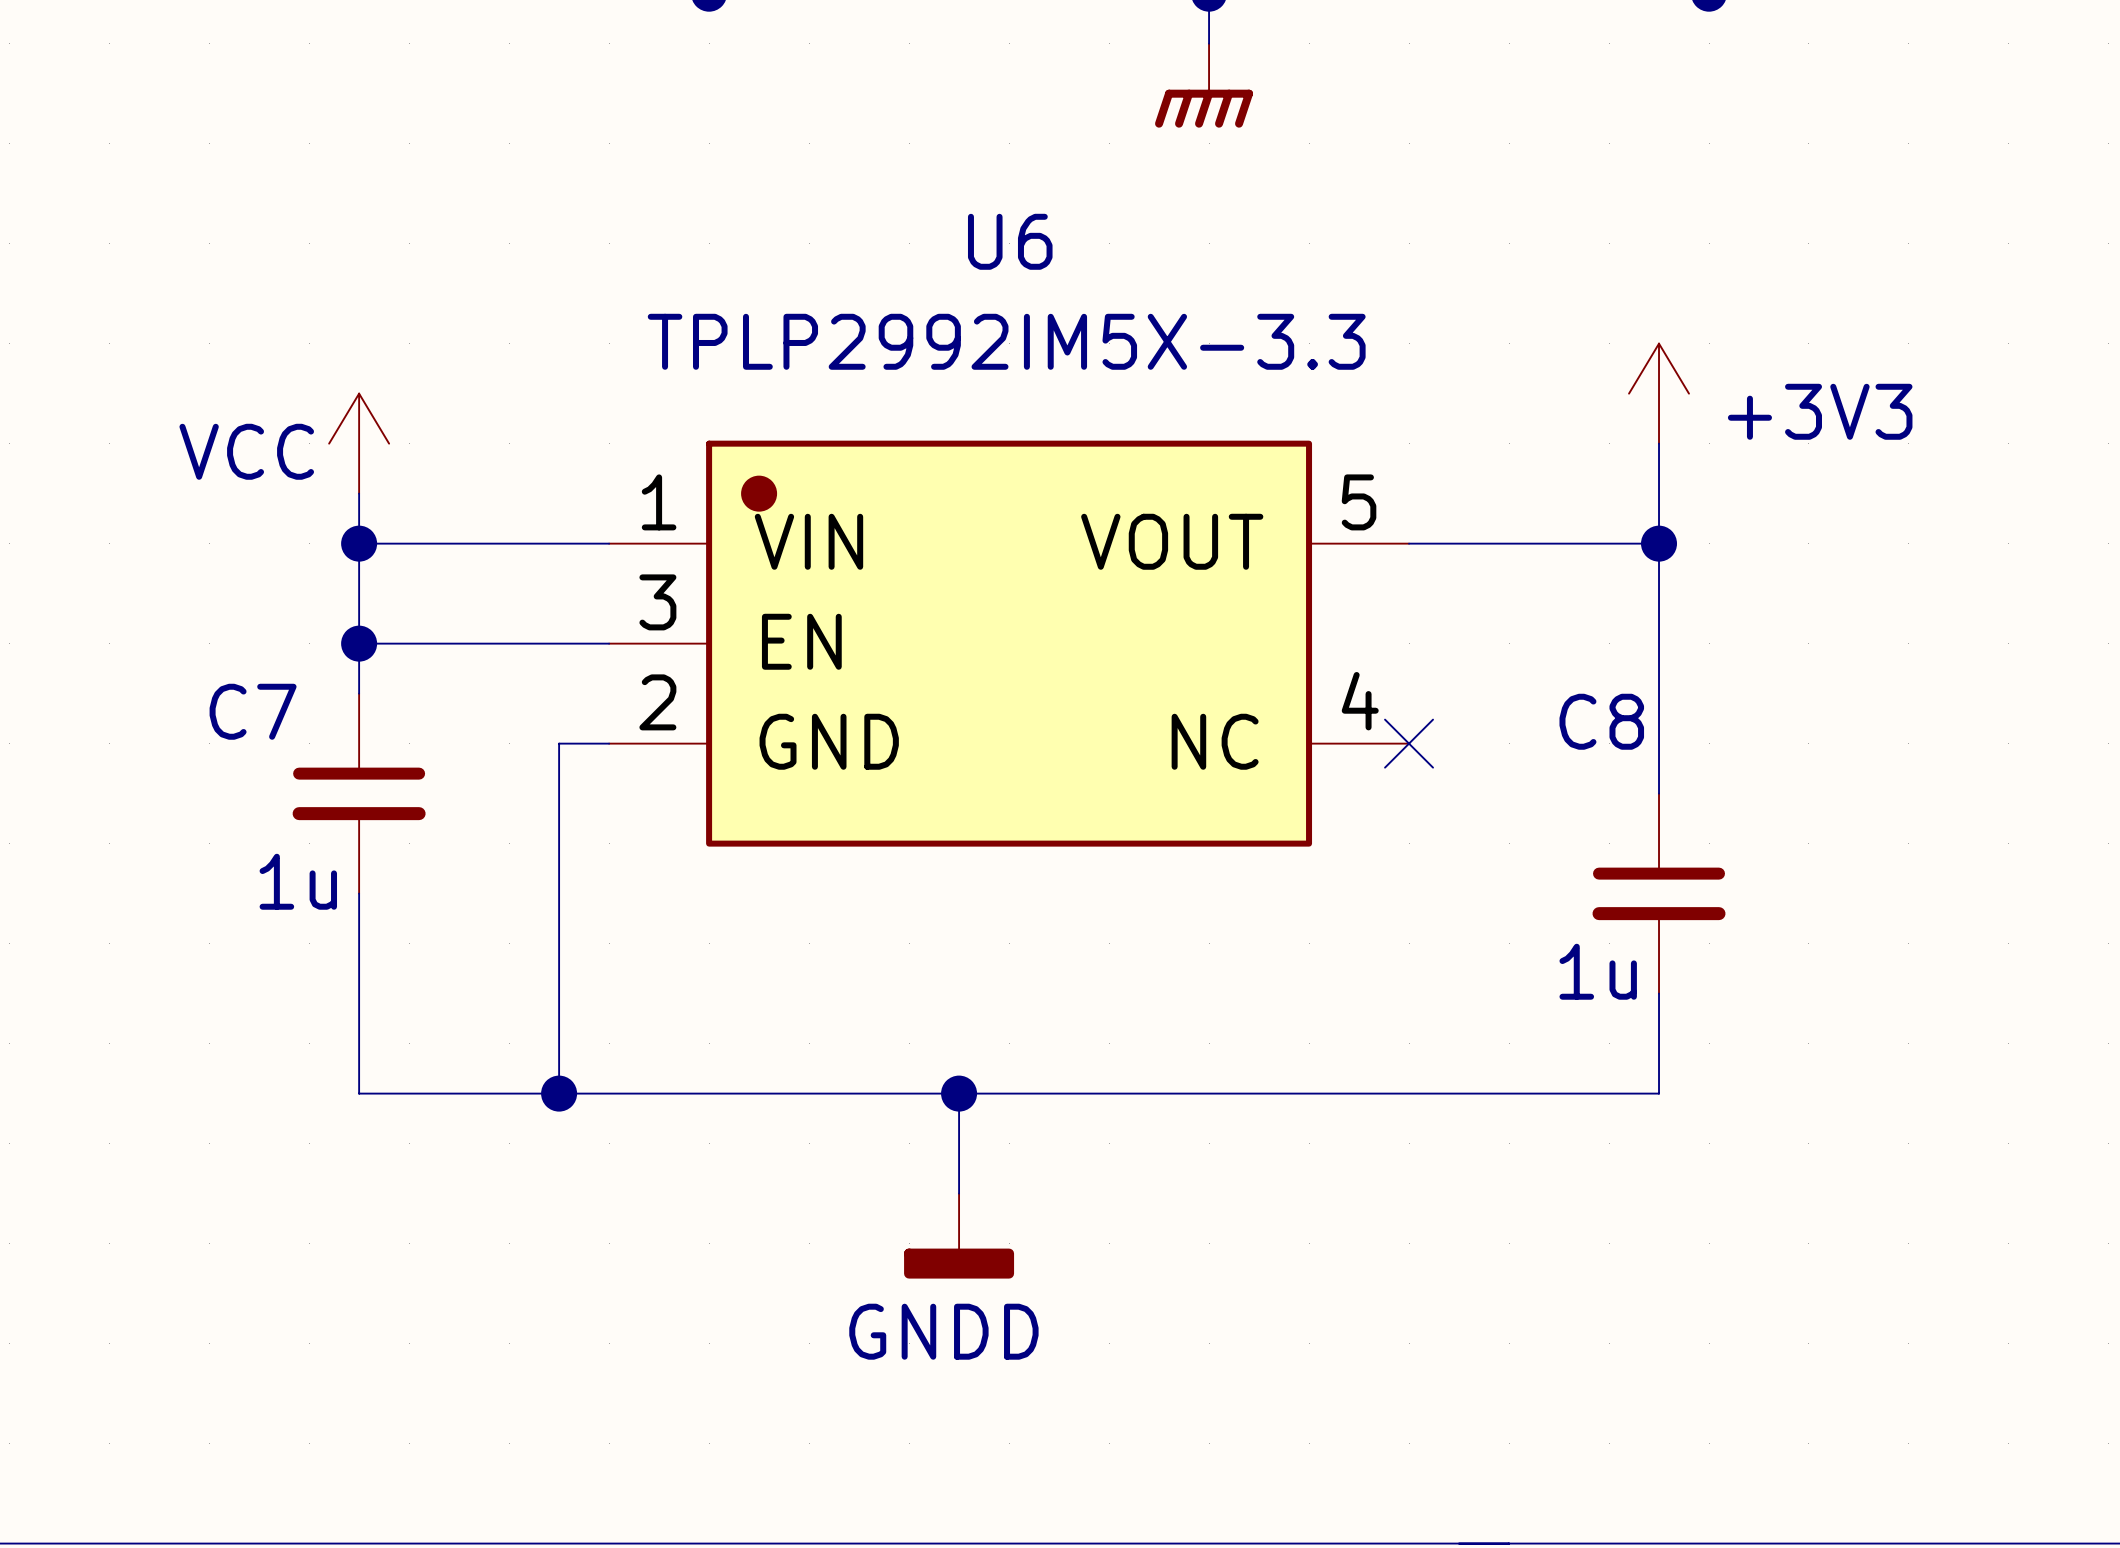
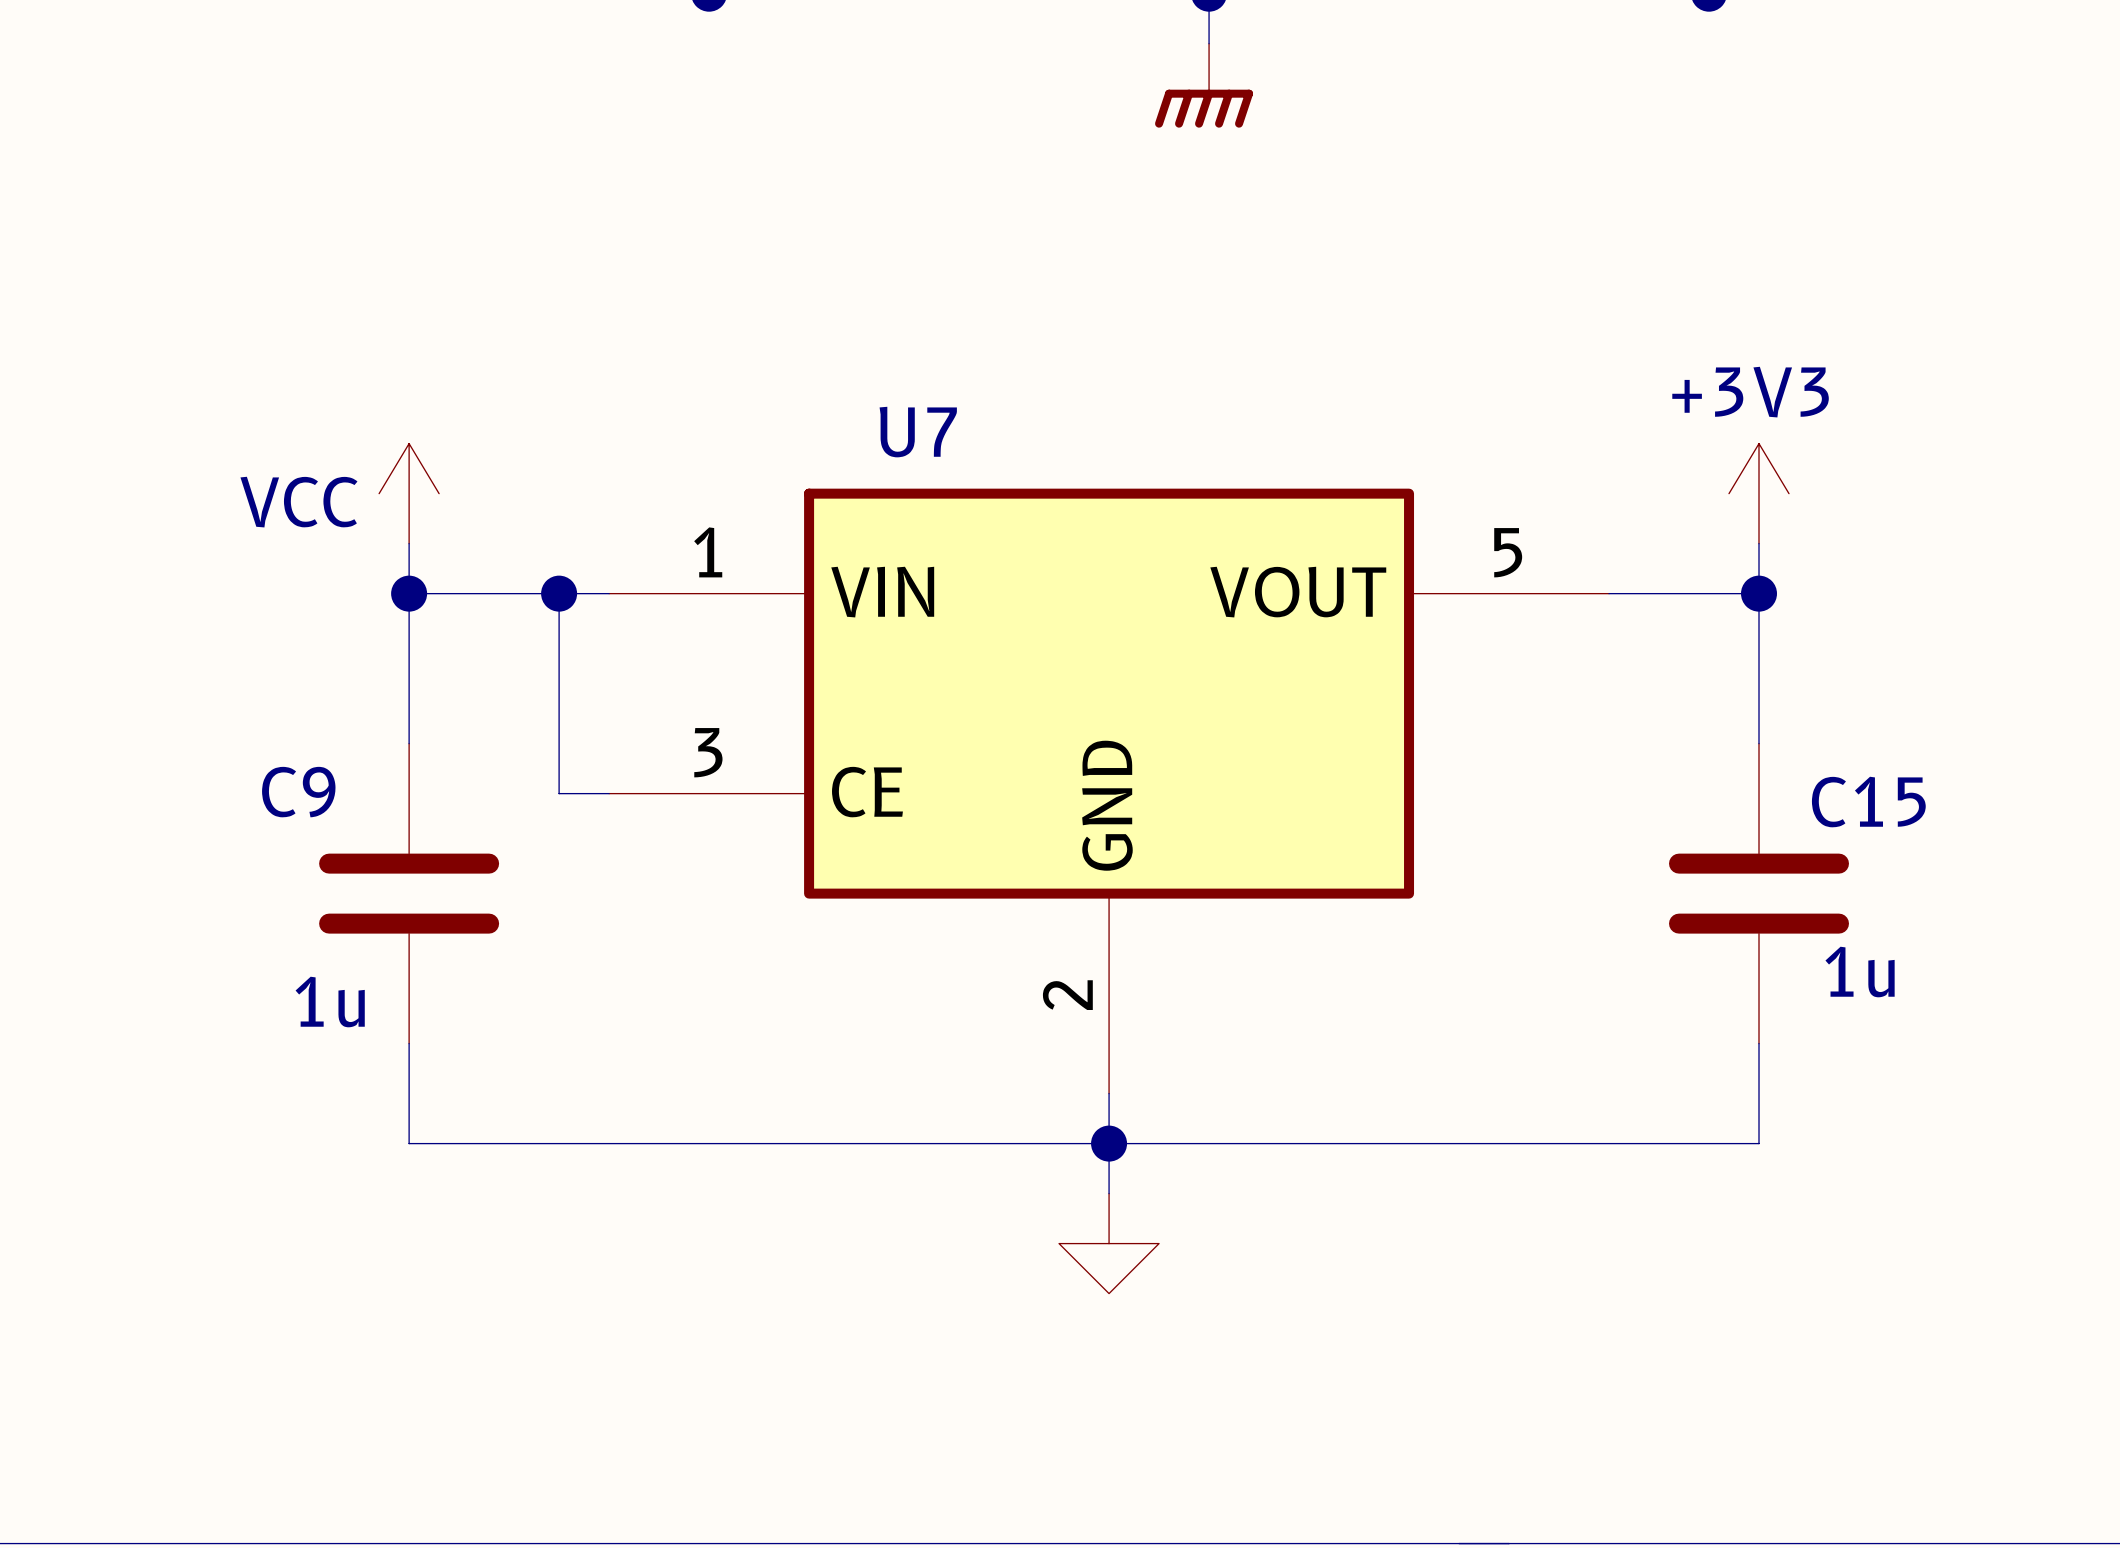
power symbol position: +3V3 (1659, 393) -> +3V3 (1759, 493)
power symbol text position: +3V3 (1820, 411) -> +3V3 (1750, 392)
power symbol position: VCC (359, 443) -> VCC (409, 493)
wire: (1659, 443) (1659, 793) -> none
wire: (359, 493) (359, 693) -> (409, 543) (409, 743)
wire: (359, 543) (609, 543) -> none
junction: (359, 543) -> none
wire: (1409, 543) (1659, 543) -> none
junction position: (1659, 543) -> (1759, 593)
wire: none -> (1759, 543) (1759, 743)
wire: none -> (409, 593) (609, 593)
junction: none -> (409, 593)
junction: none -> (559, 593)
wire: none -> (1609, 593) (1759, 593)
wire: (359, 643) (609, 643) -> none
junction: (359, 643) -> none
U6: TPLP2992IM5X-3.3 (1009, 643) -> none
wire: (559, 743) (609, 743) -> (559, 743) (559, 593)
no-connect mark: (1409, 743) -> none
U7: none -> (1109, 791)
C7: 1u (359, 793) -> none
wire: (559, 793) (559, 1093) -> (559, 793) (609, 793)
wire: (359, 893) (359, 1093) (1659, 1093) (1659, 993) -> none
C9: none -> 1u (409, 893)
C8: 1u (1659, 893) -> none
C15: none -> 1u (1759, 893)
wire: none -> (409, 1043) (409, 1143) (1759, 1143) (1759, 1043)
junction: (559, 1093) -> none
wire: (959, 1093) (959, 1193) -> (1109, 1093) (1109, 1193)
junction position: (959, 1093) -> (1109, 1143)
power symbol: GNDD (959, 1236) -> none
power symbol: none -> (1109, 1243)

